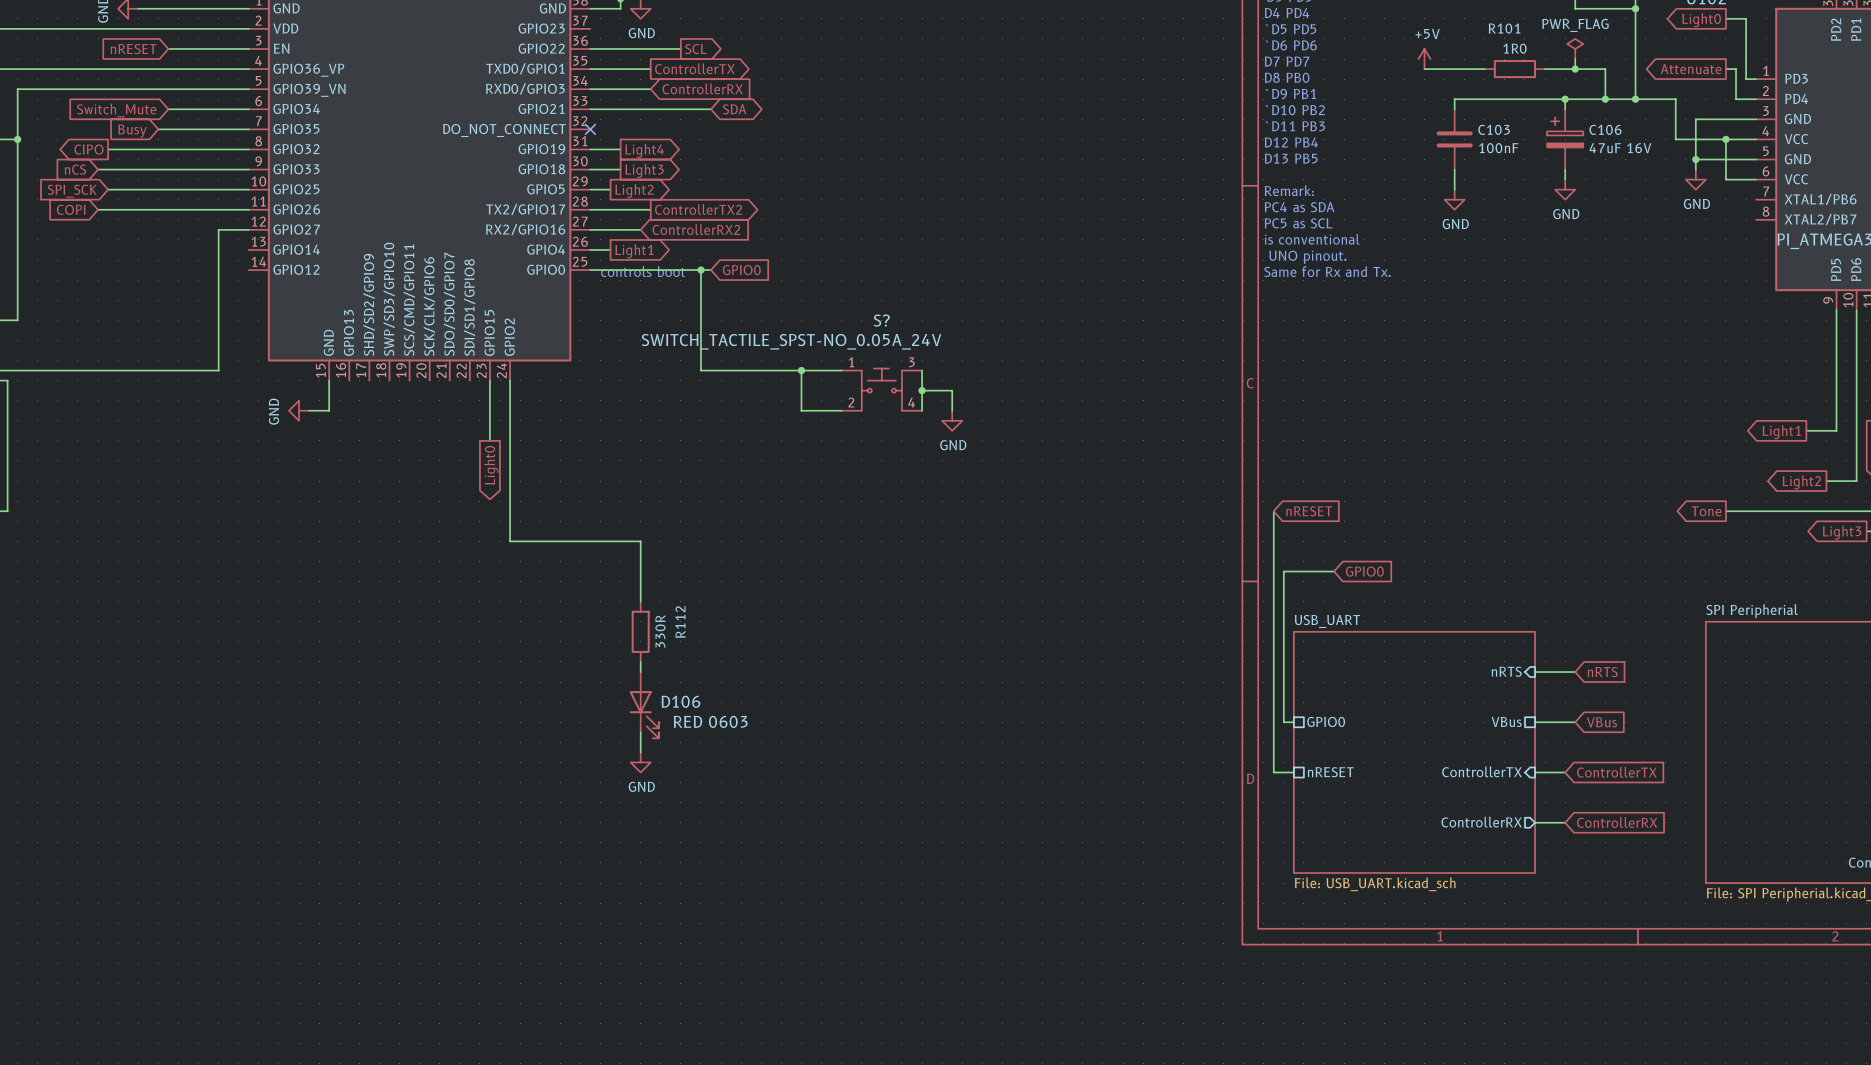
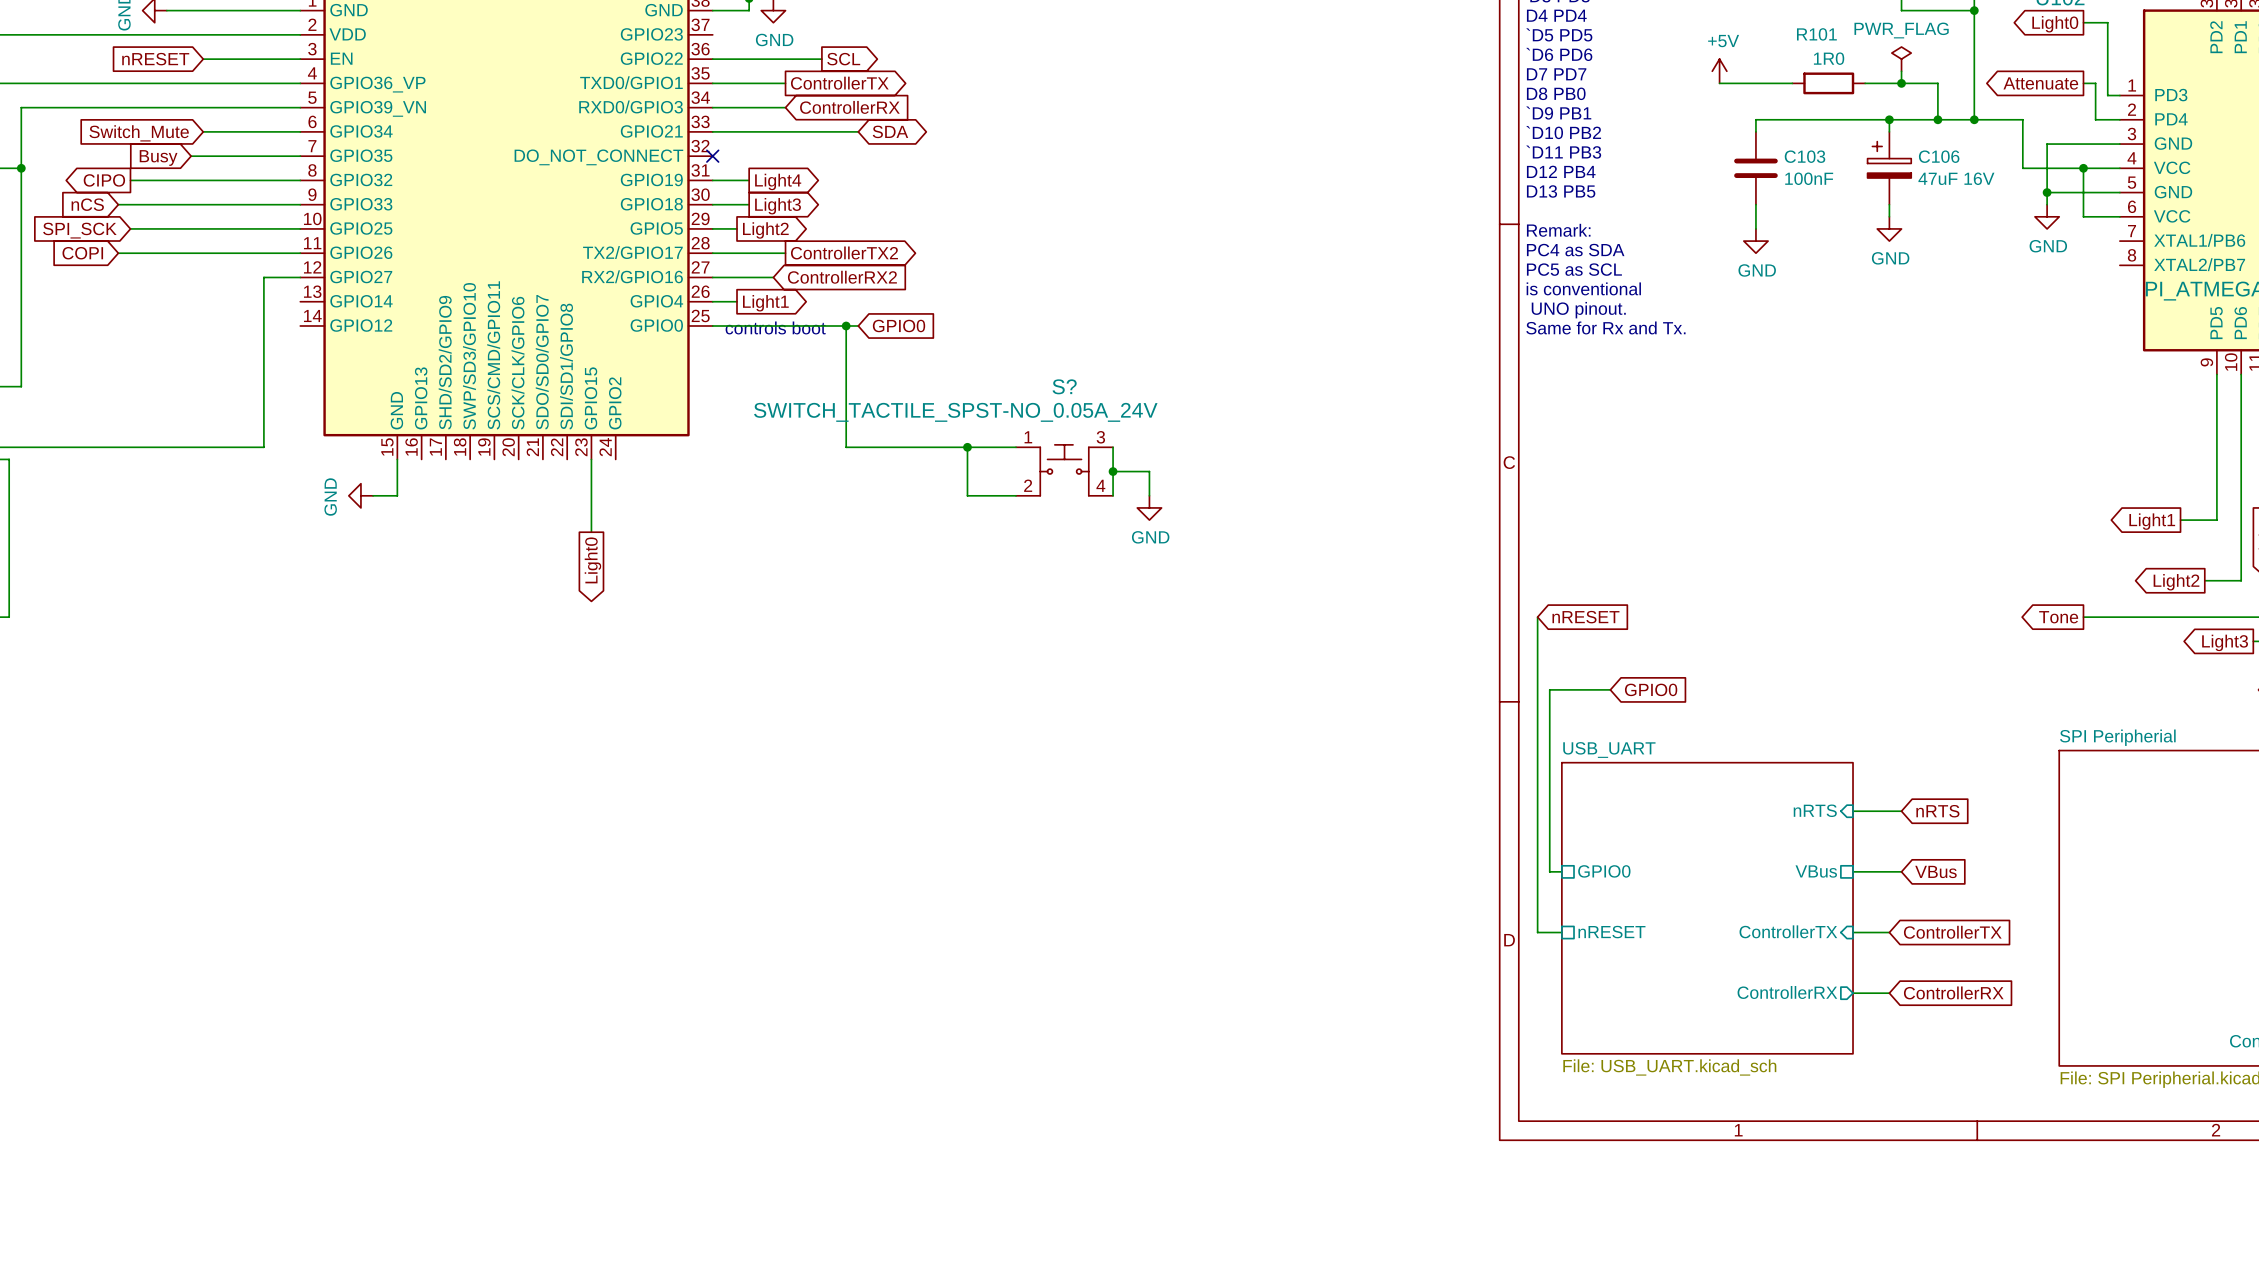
wire: (510, 380) (510, 541) (640, 541) (640, 601) -> none
R112: 330R (640, 631) -> none
wire: (640, 661) (640, 672) -> none
D106: RED 0603 (644, 705) -> none
wire: (640, 732) (640, 752) -> none
power symbol: GND (640, 762) -> none

